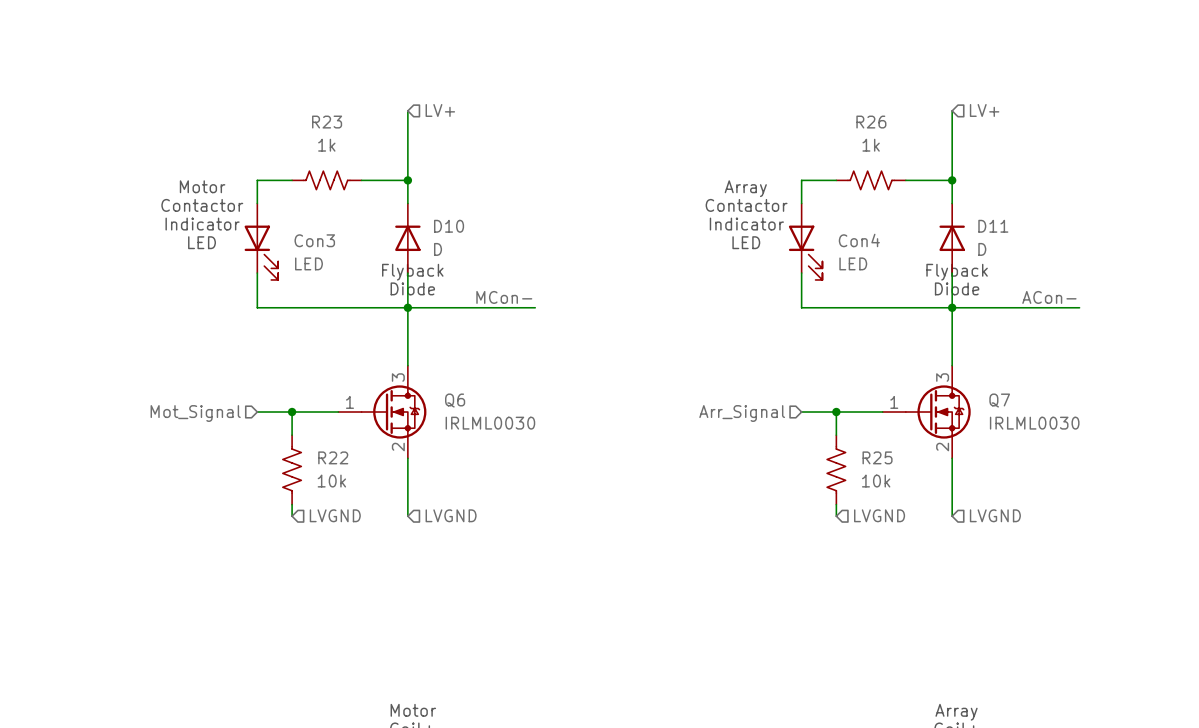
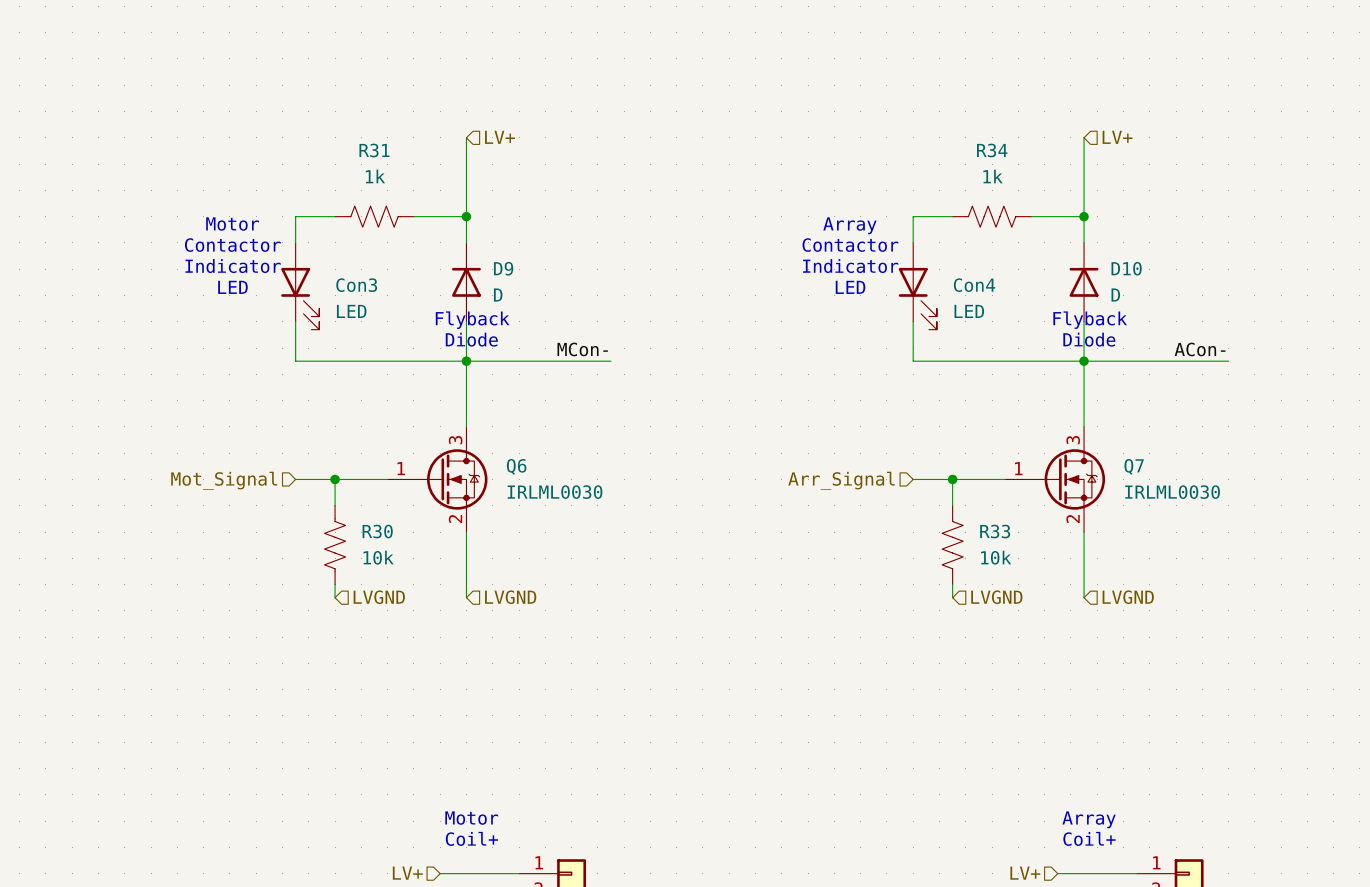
R23 name: R23 (327, 122) -> R31 (374, 150)
R26 name: R26 (871, 122) -> R34 (992, 150)
D10 name: D10 (449, 226) -> D9 (503, 268)
D11 name: D11 (993, 226) -> D10 (1126, 268)
R22 name: R22 (333, 457) -> R30 (377, 531)
R25 name: R25 (877, 457) -> R33 (995, 531)

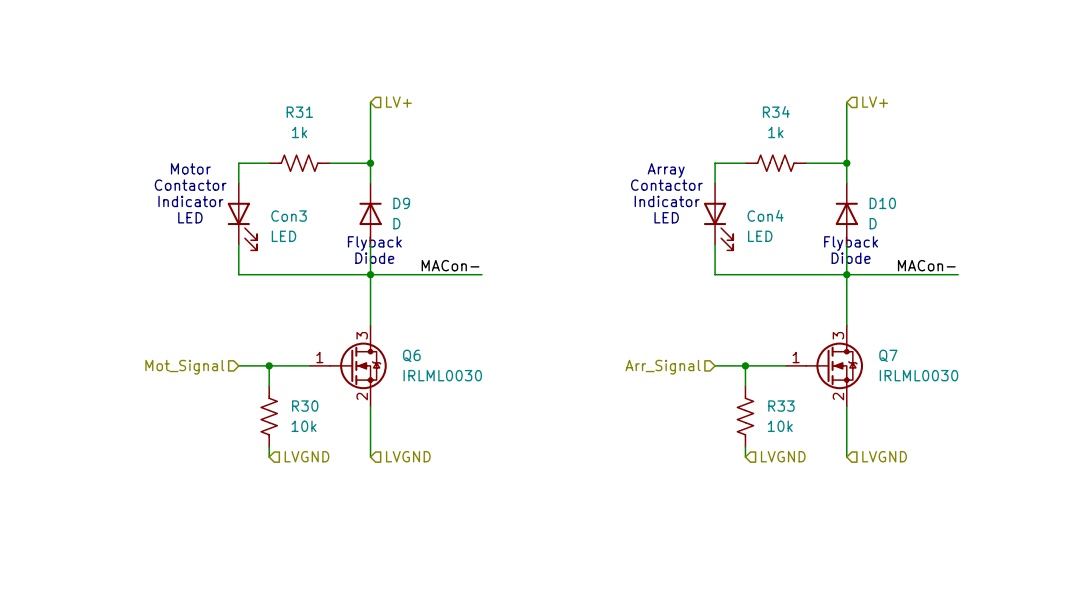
label: MCon- (582, 349) -> MACon- (450, 265)
label: ACon- (1200, 349) -> MACon- (926, 265)

